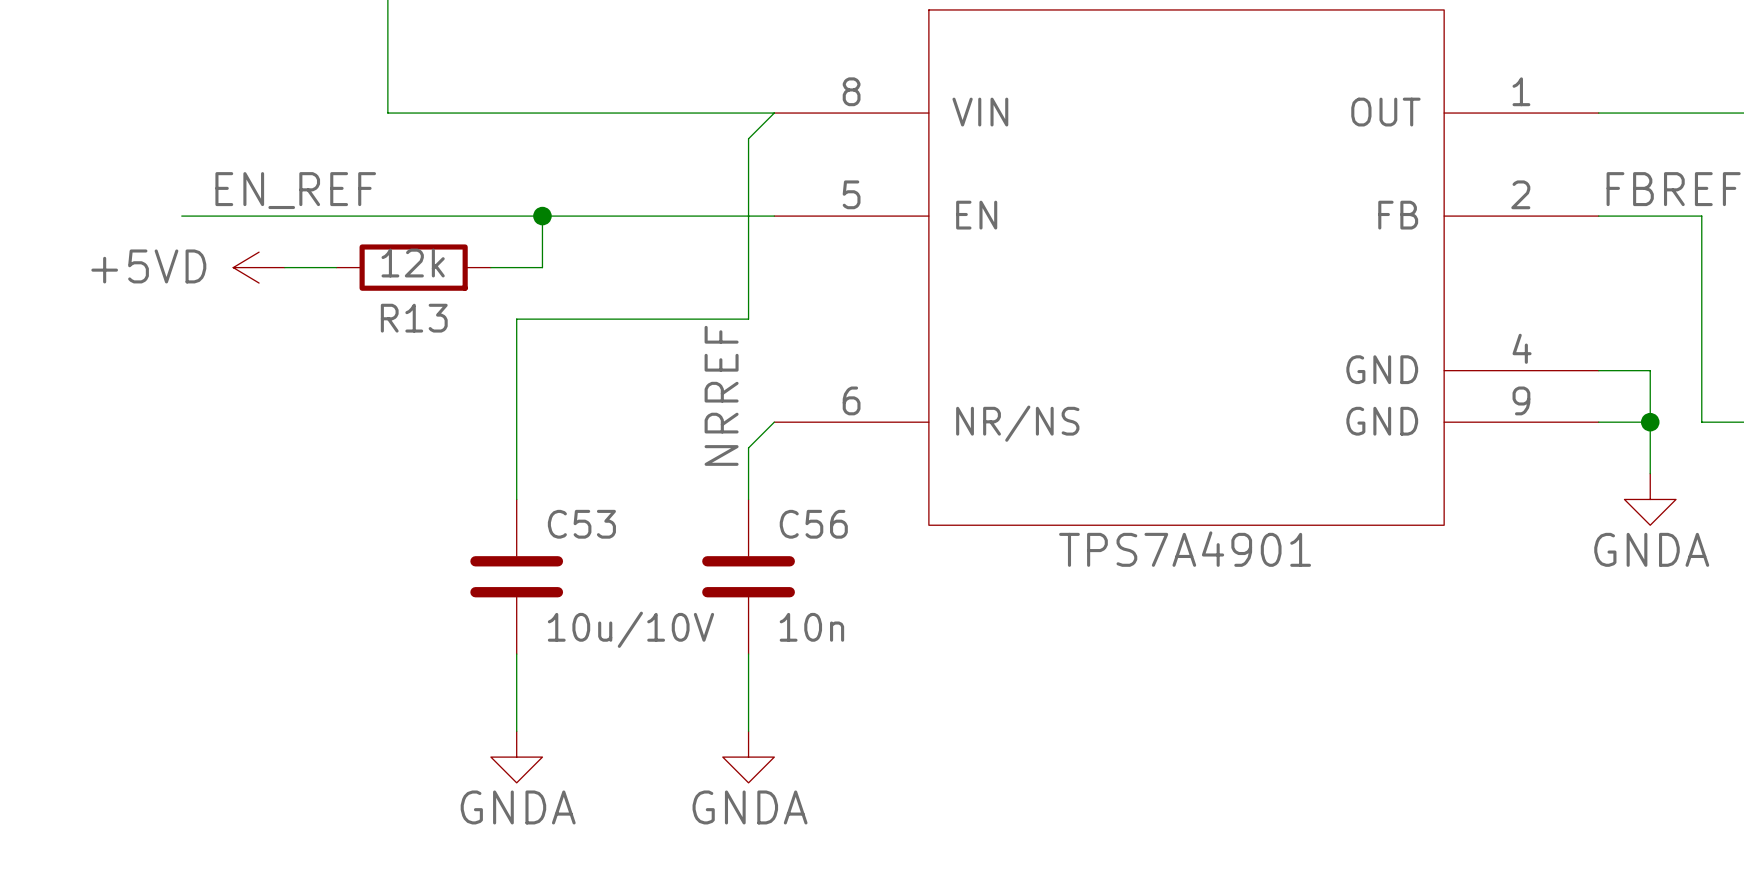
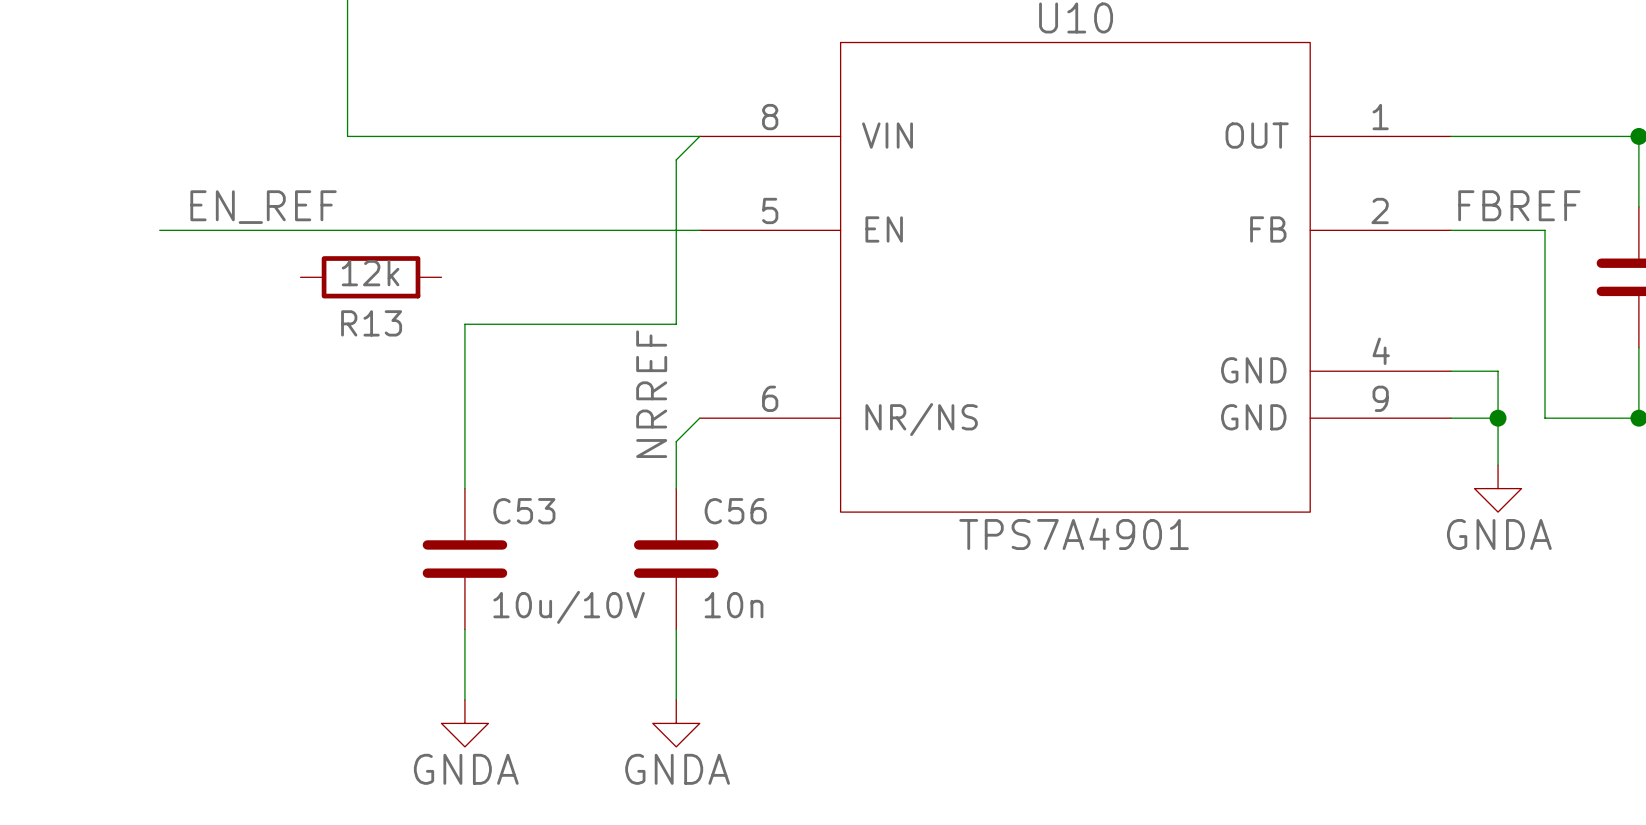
wire: (542, 216) (542, 267) (490, 267) -> none
junction: (542, 216) -> none
power symbol: +5VD (259, 267) -> none
wire: (284, 267) (336, 267) -> none

